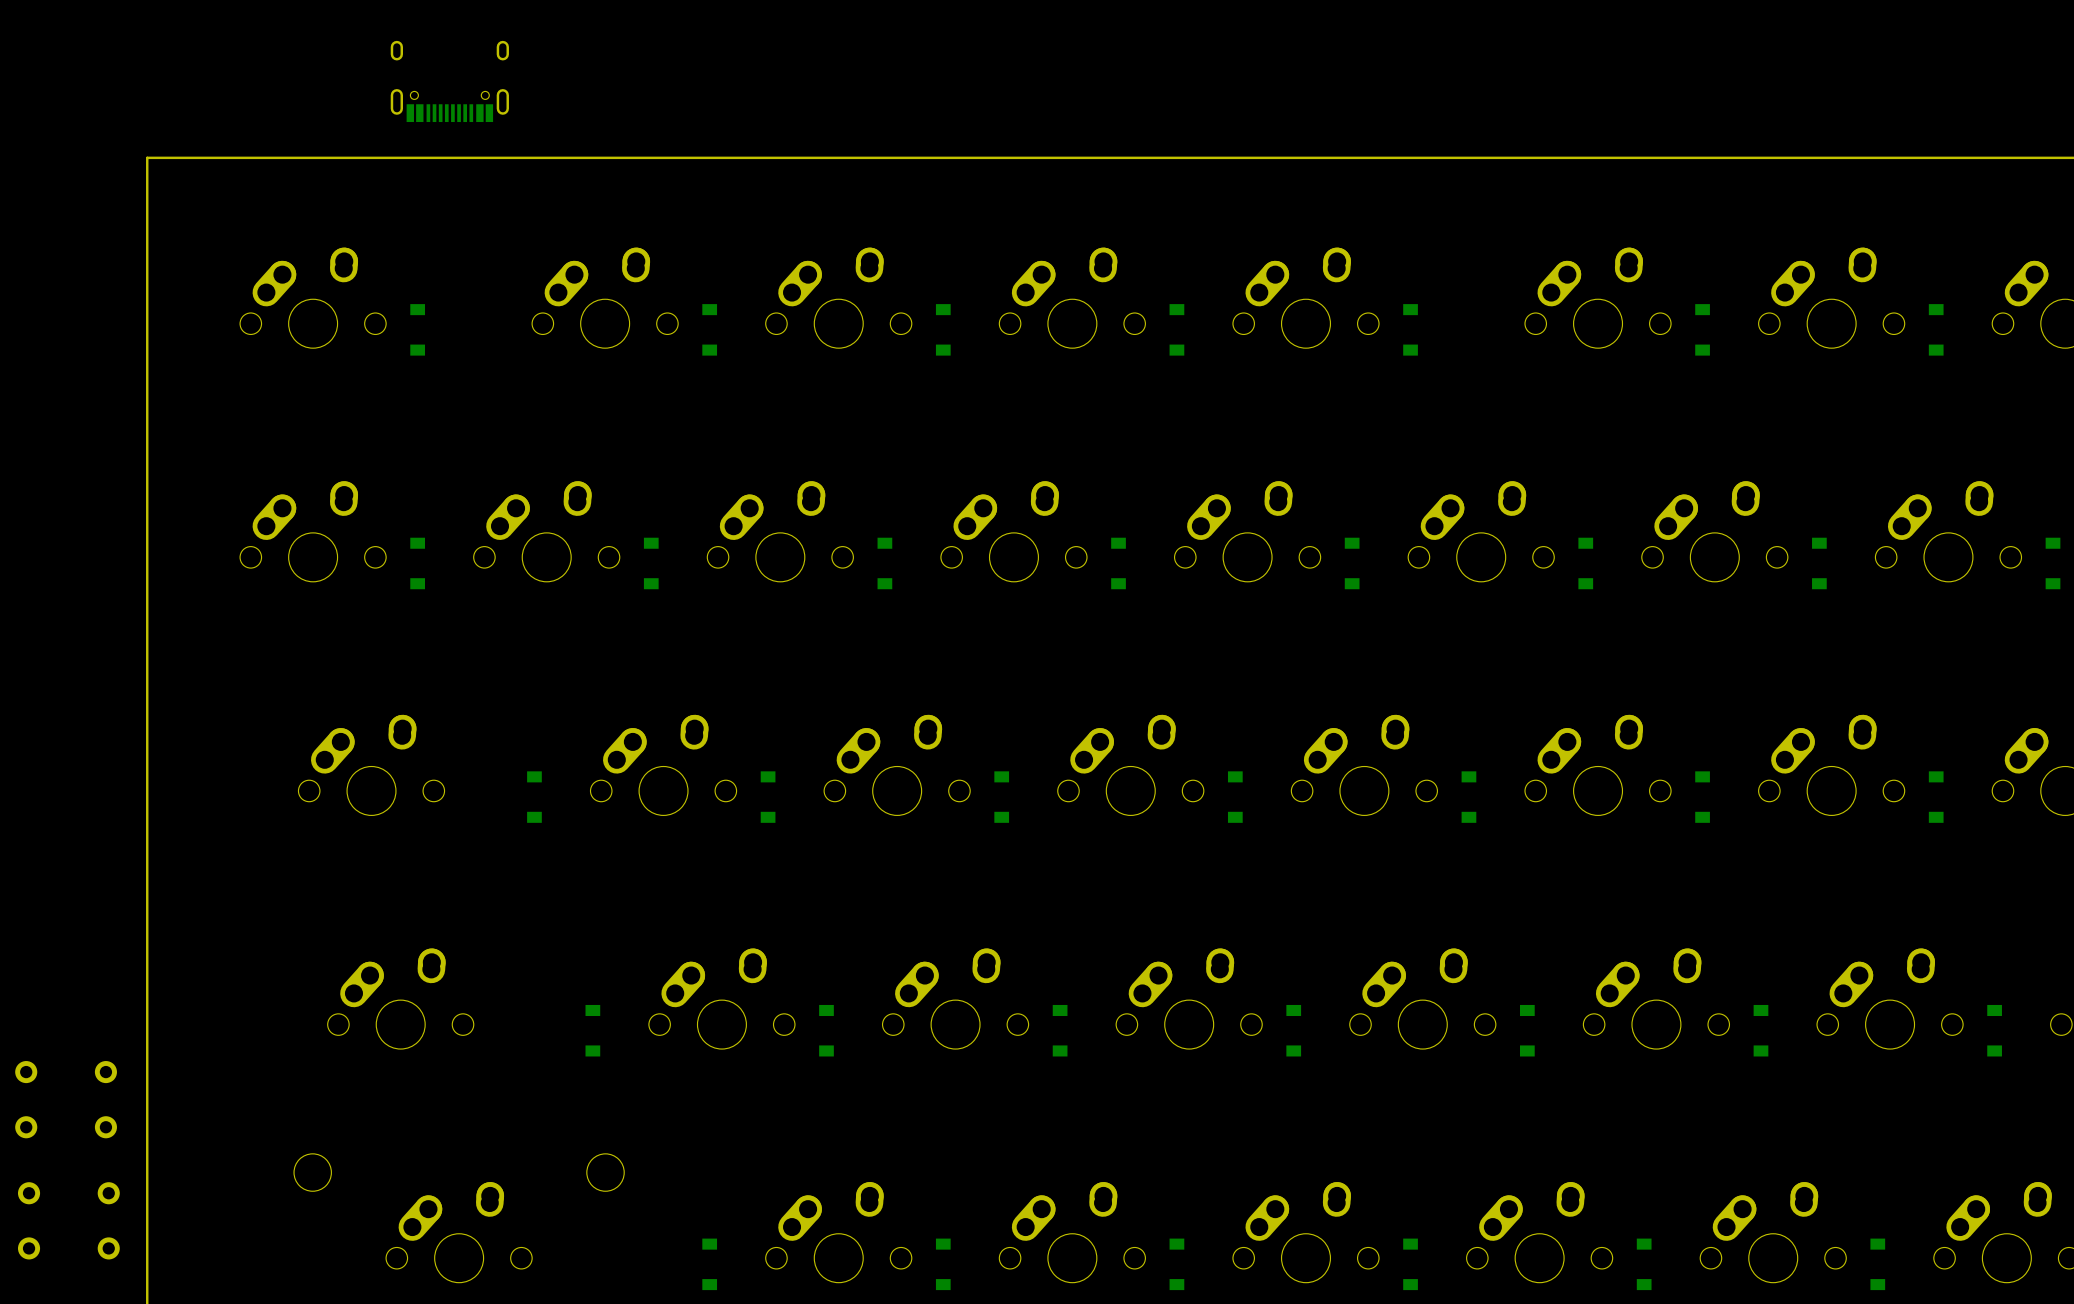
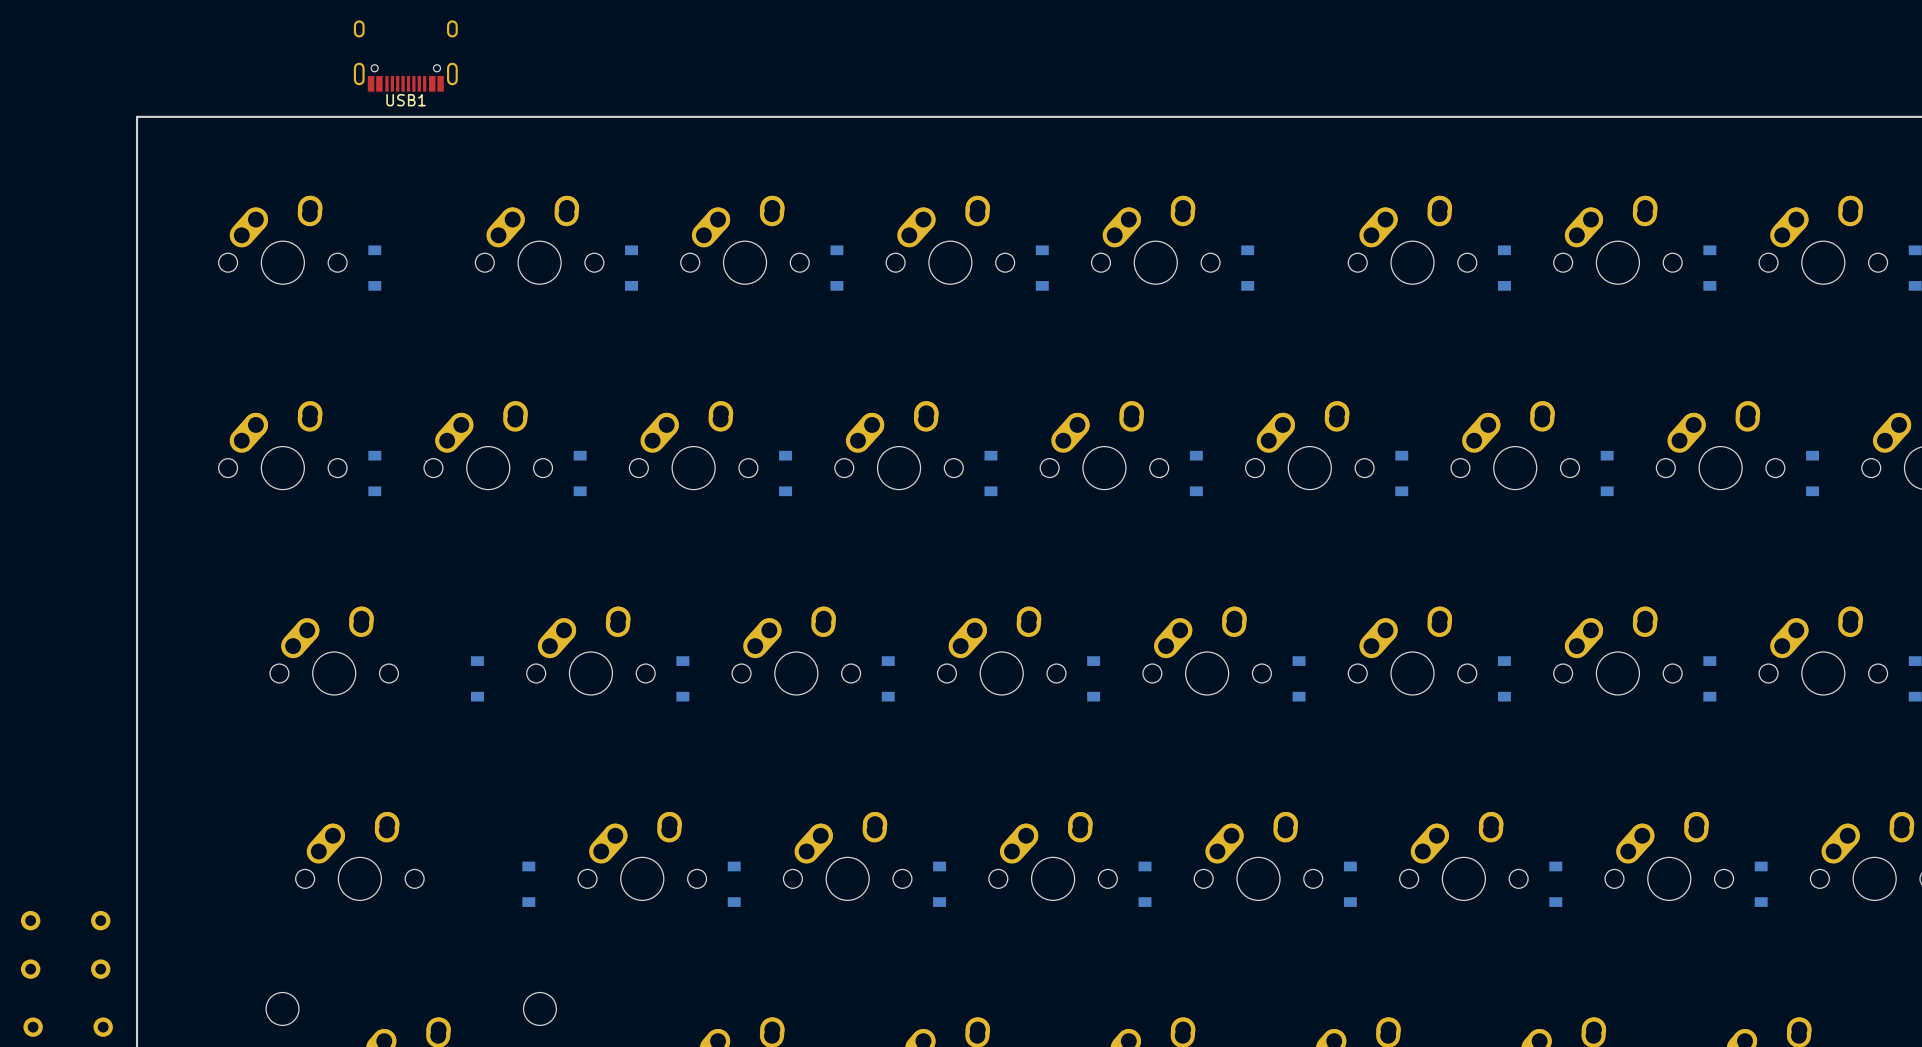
USB1 side: bottom (449, 81) -> top (405, 55)

